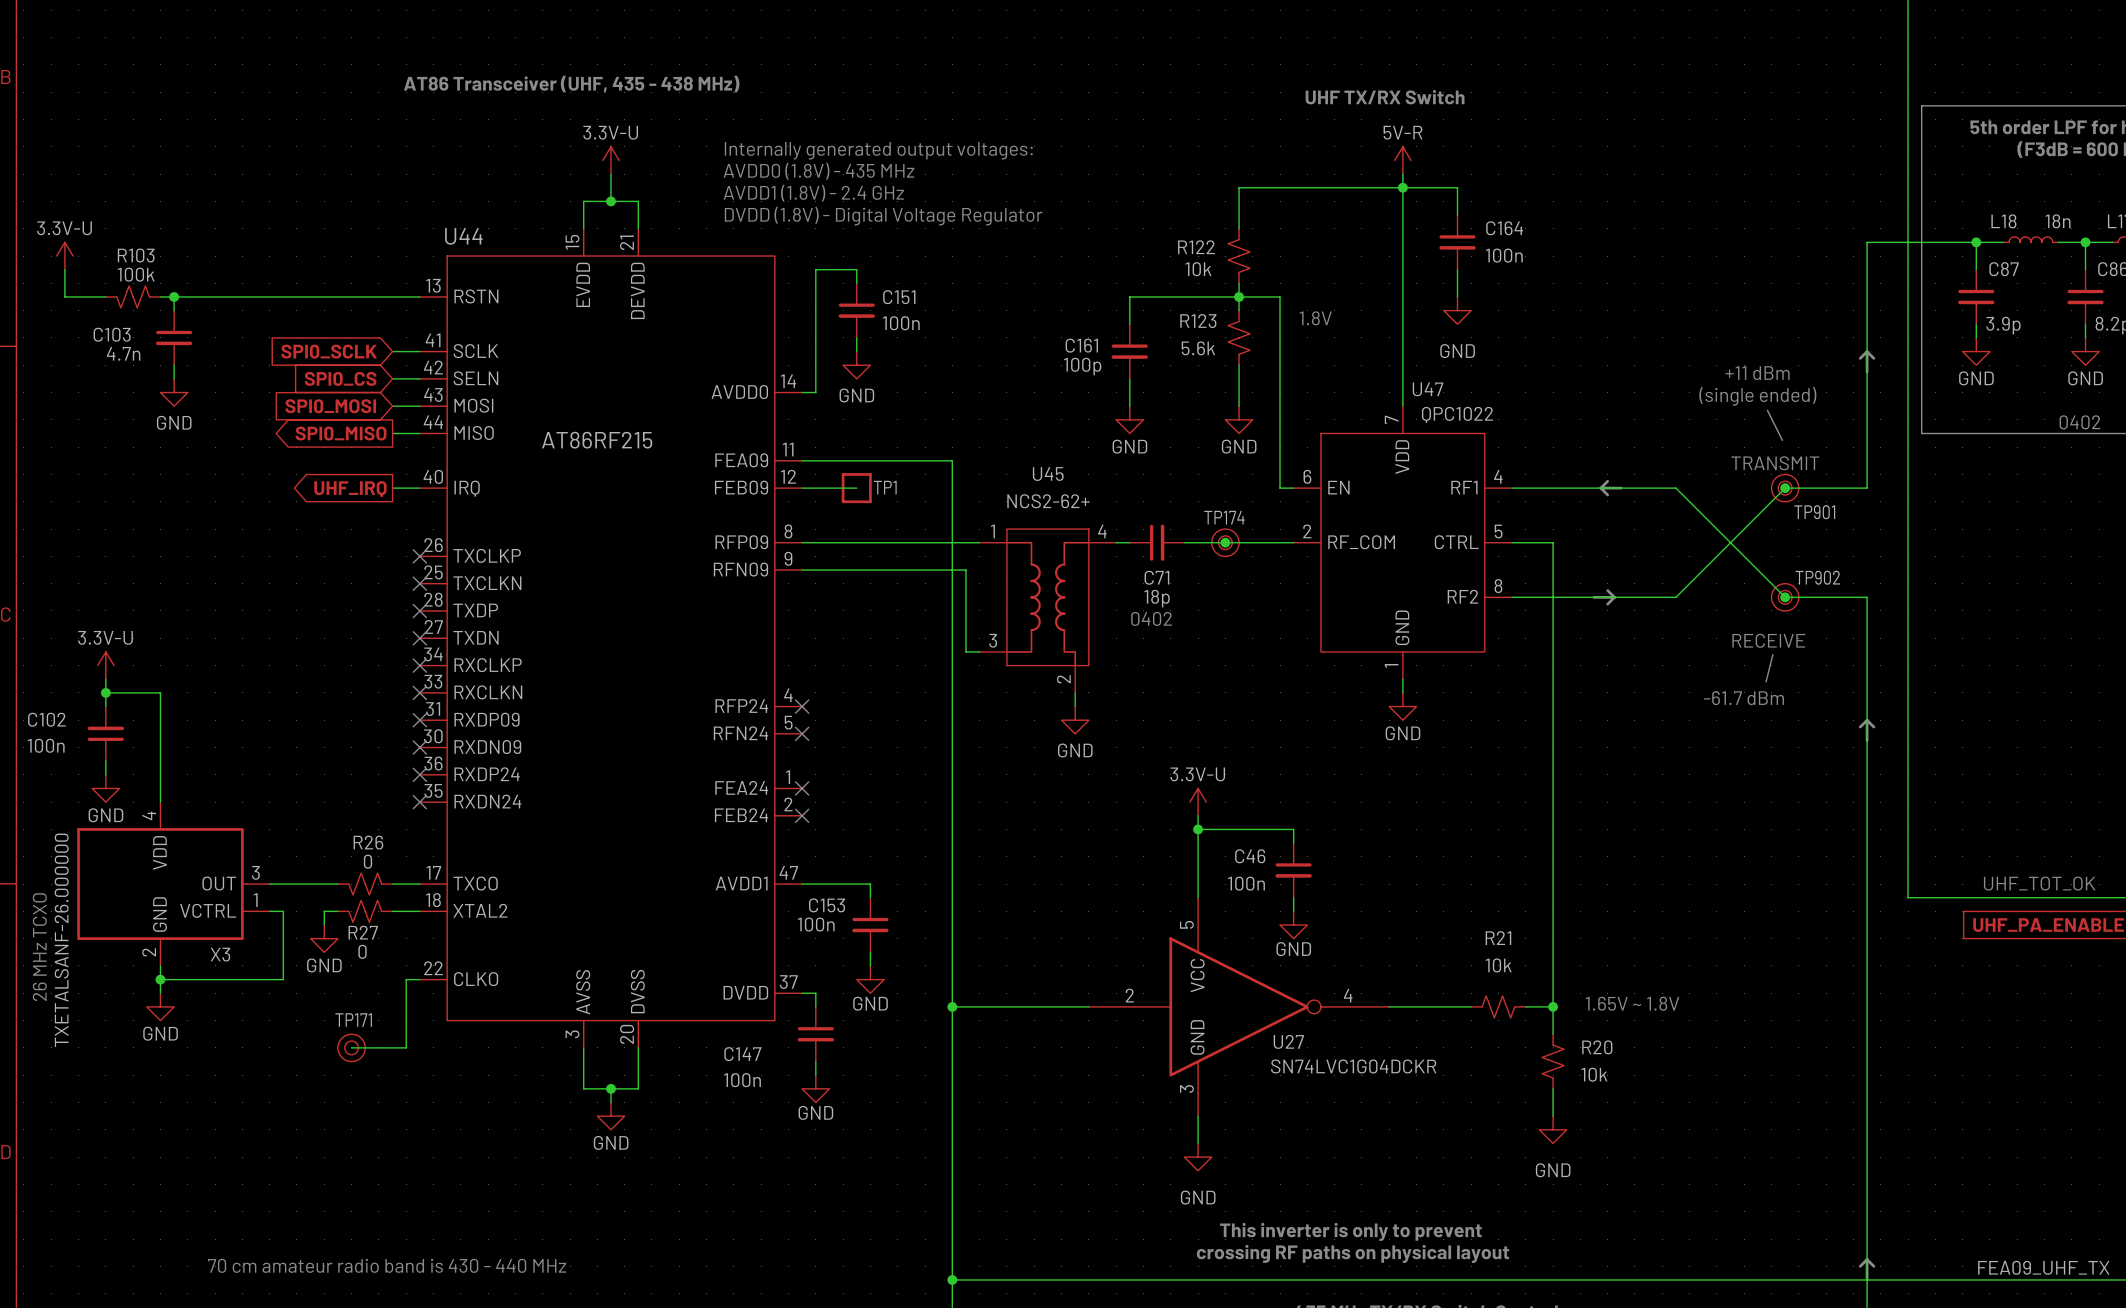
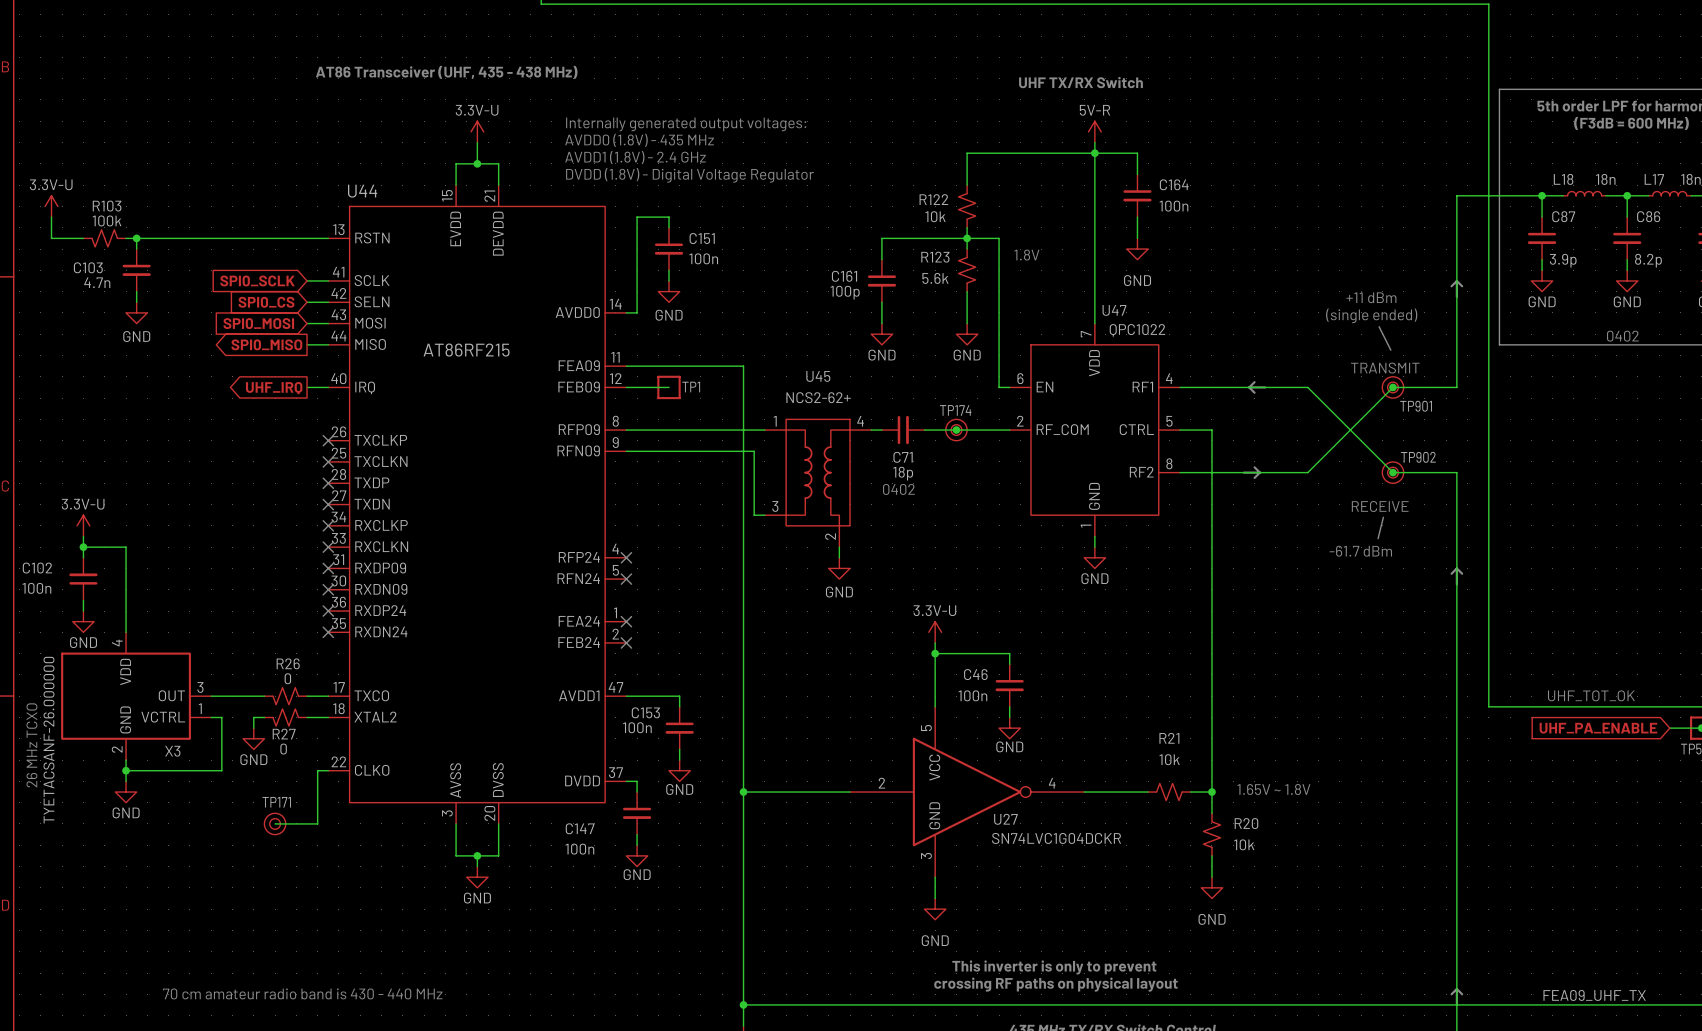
X3 value: TXETALSANF-26.000000 (61, 940) -> TYETACSANF-26.000000 (48, 740)

